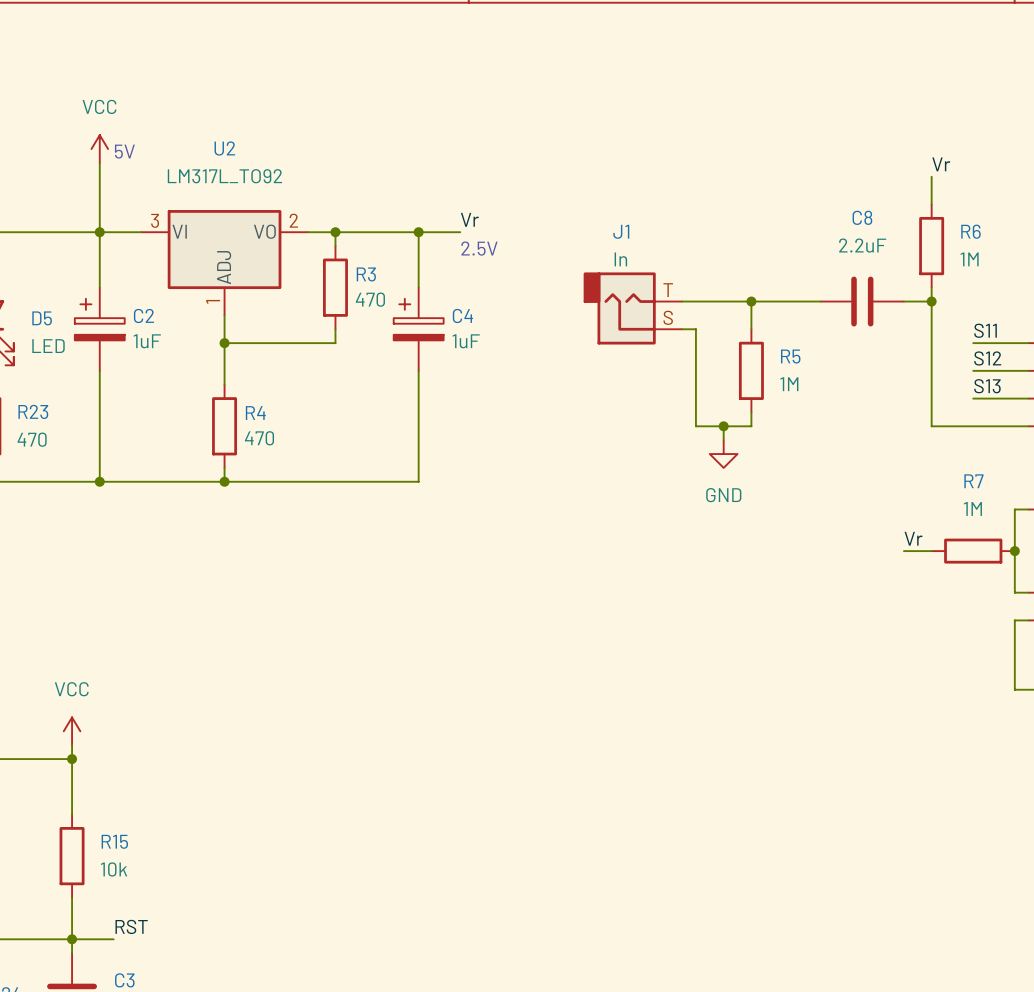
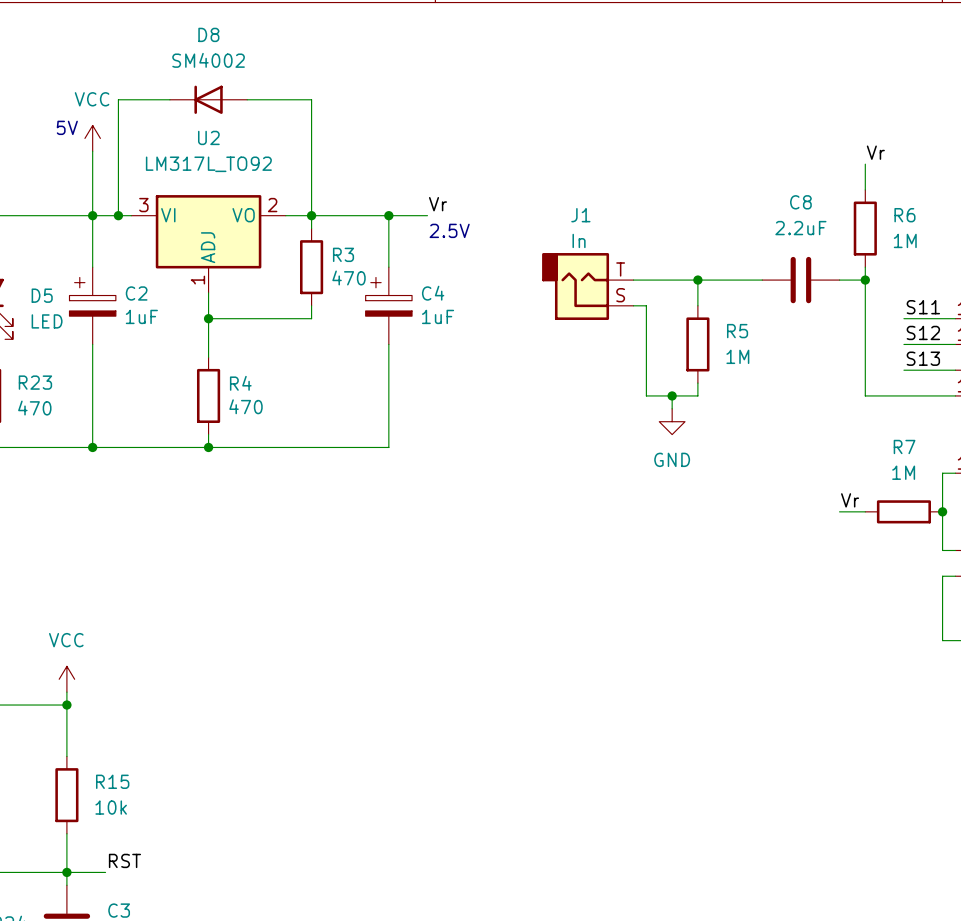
wire: none -> (169, 99) (118, 99) (118, 215)
D8: none -> SM4002 (208, 99)
wire: none -> (247, 99) (311, 99) (311, 215)
text position: 5V (124, 151) -> 5V (67, 127)
junction: none -> (118, 215)

